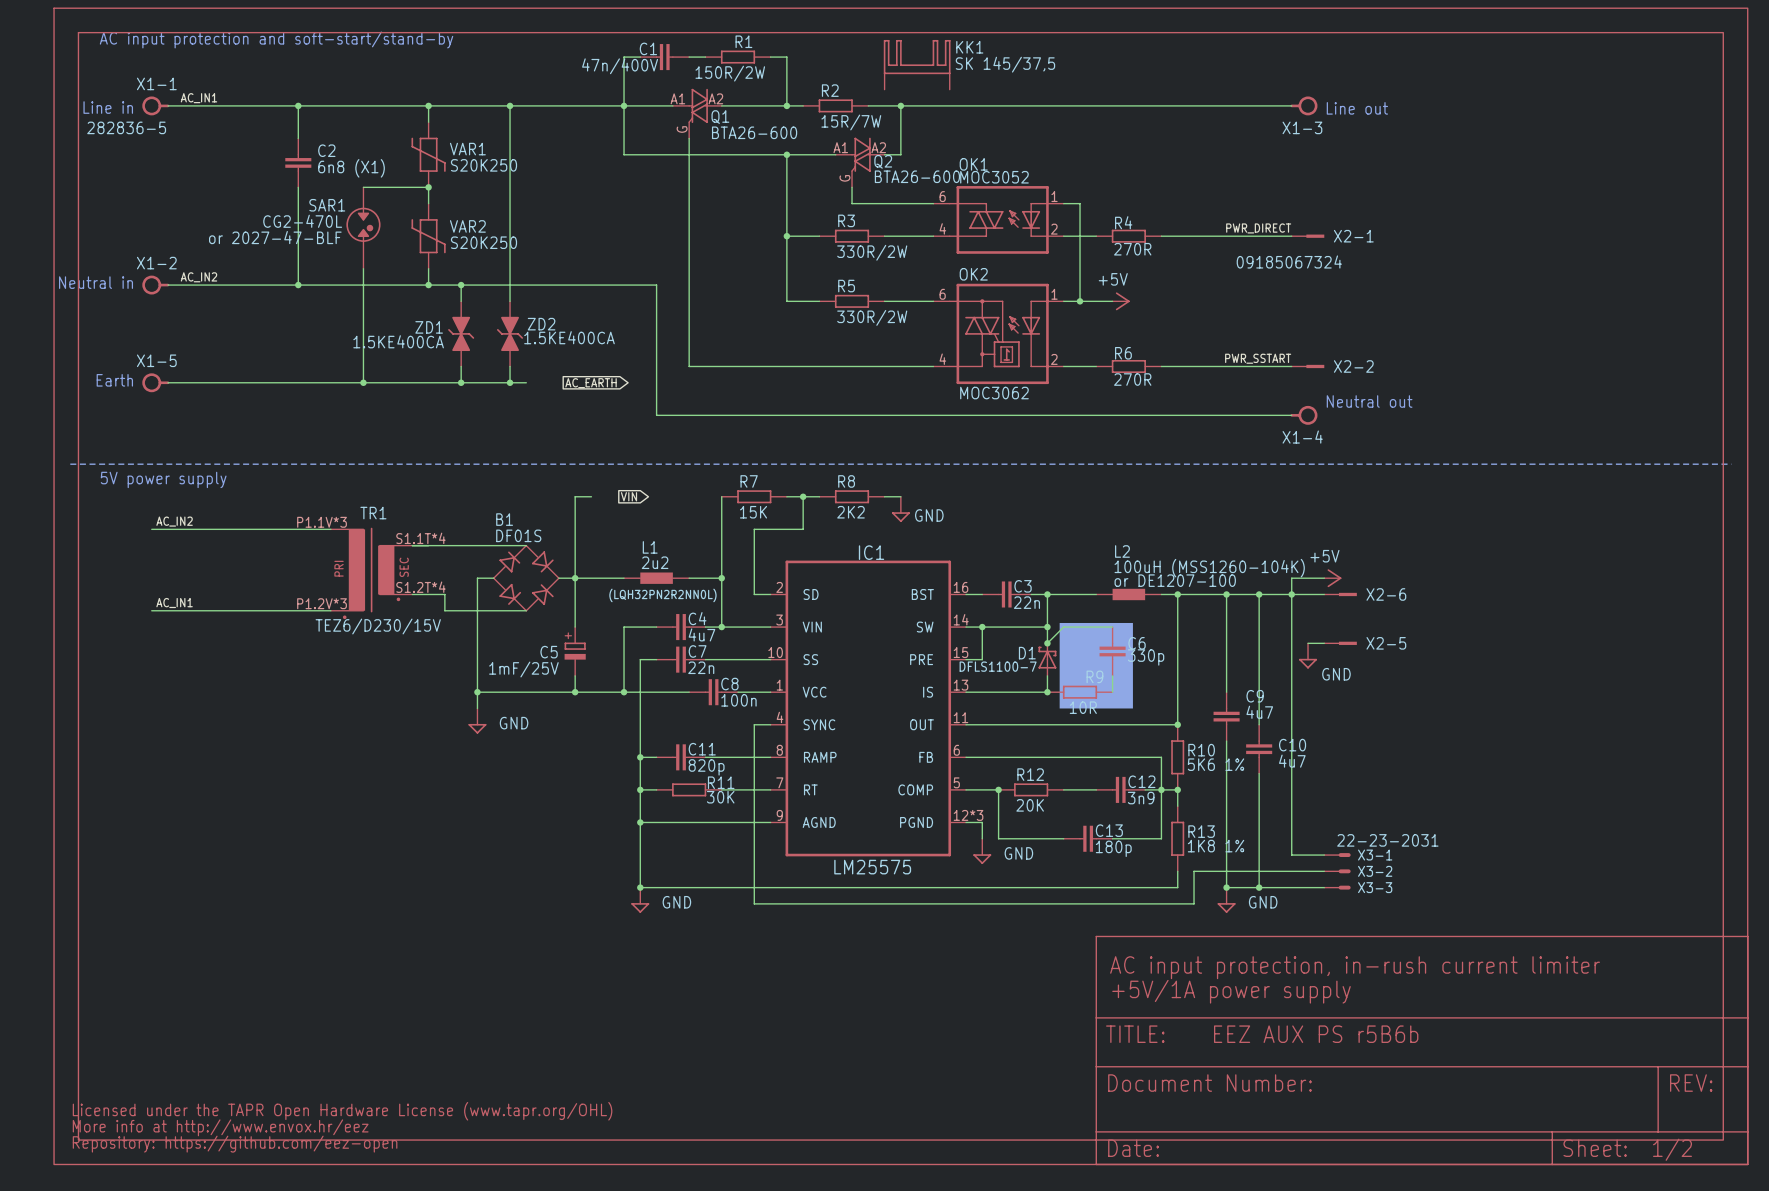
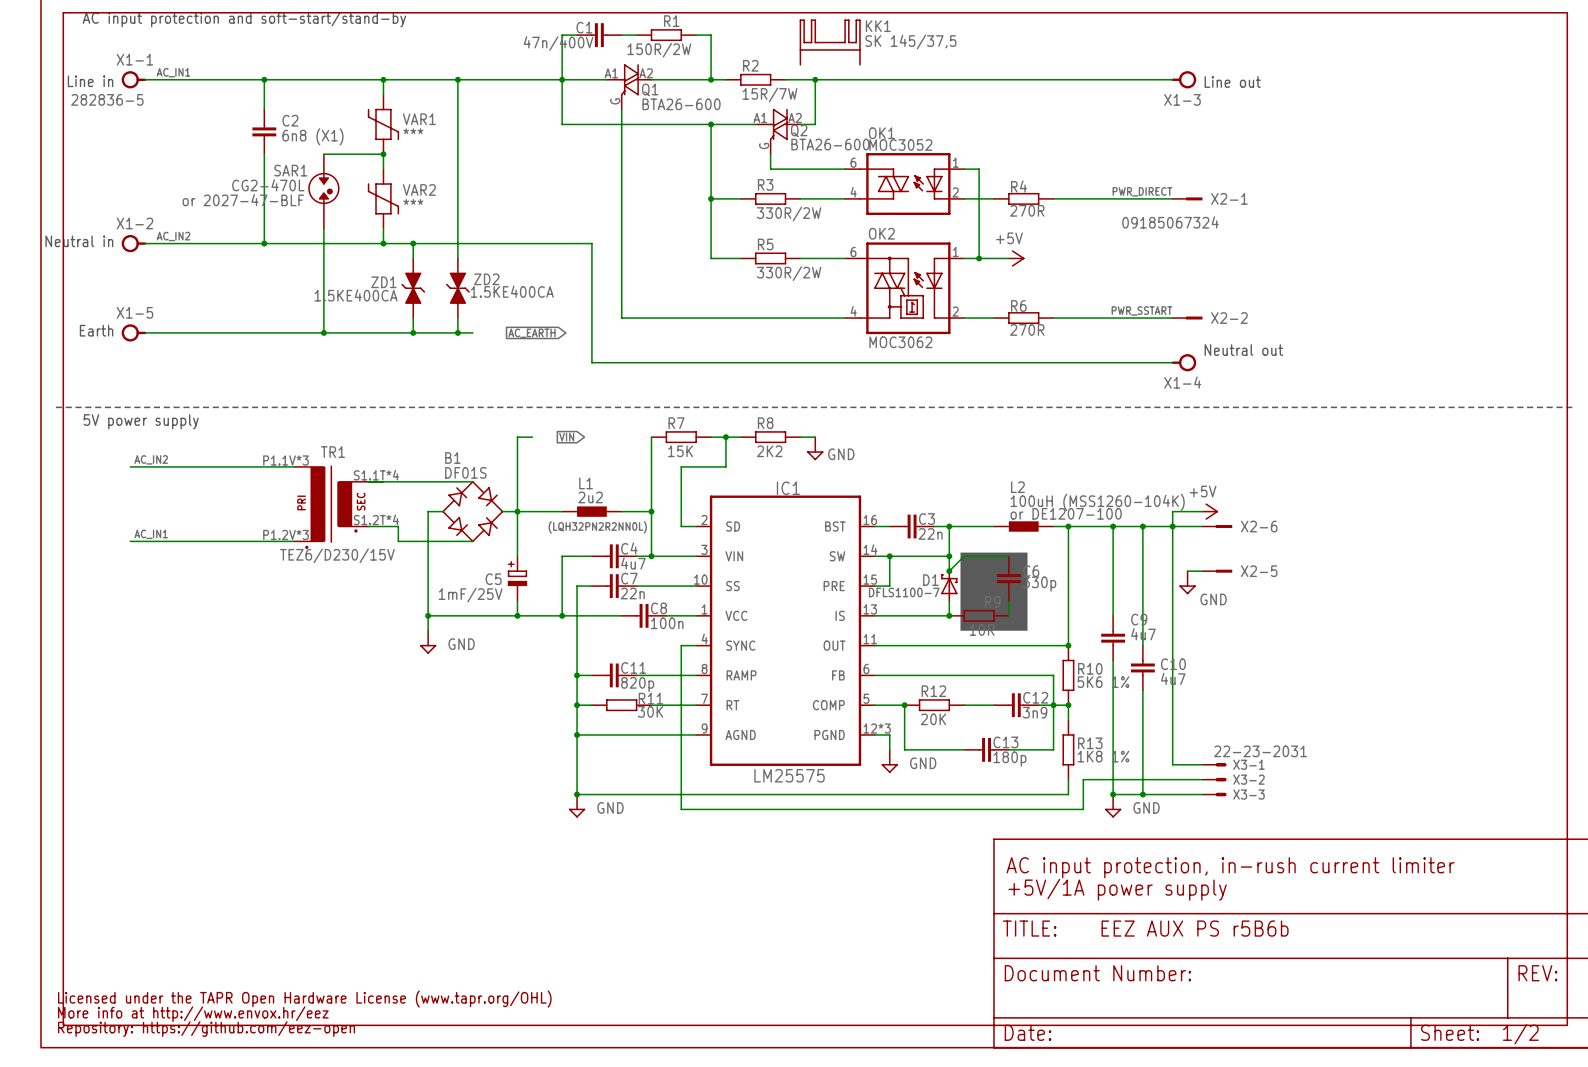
VAR1 value: S20K250 (483, 165) -> *** (413, 131)
VAR2 value: S20K250 (483, 242) -> *** (413, 201)

